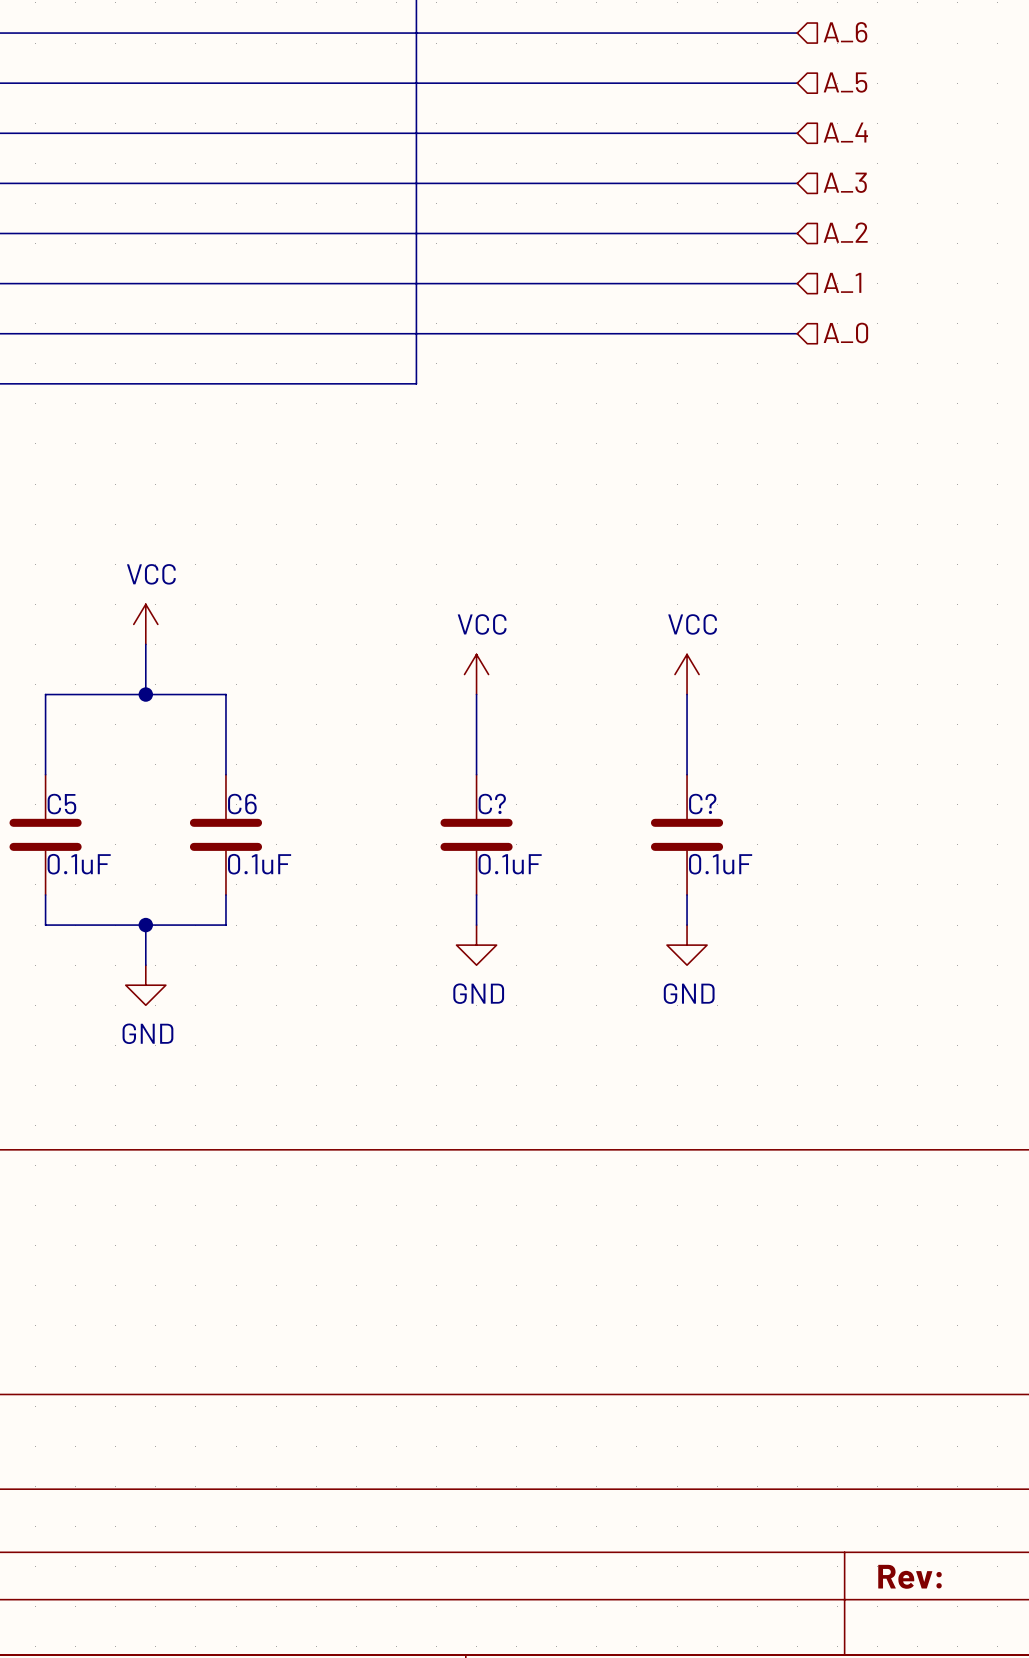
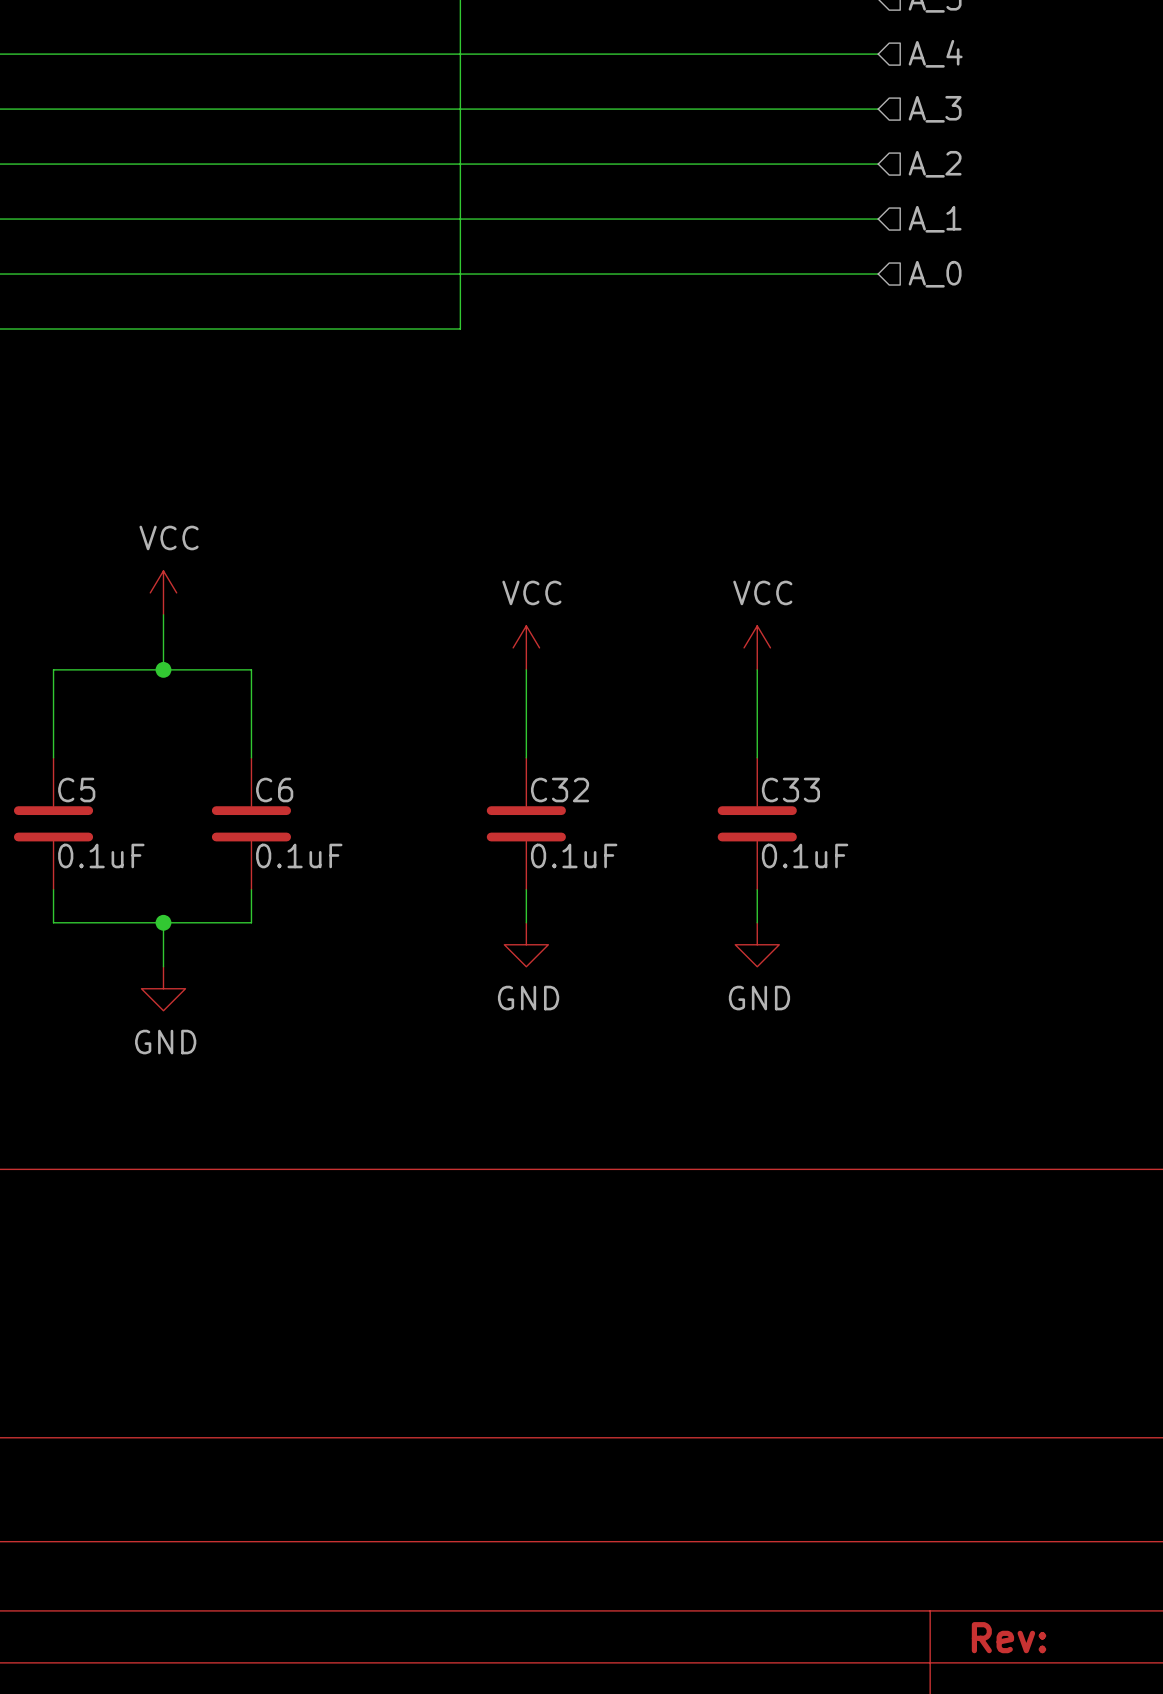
C? name: C? (492, 804) -> C32 (560, 790)
C? name: C? (702, 804) -> C33 (790, 790)

